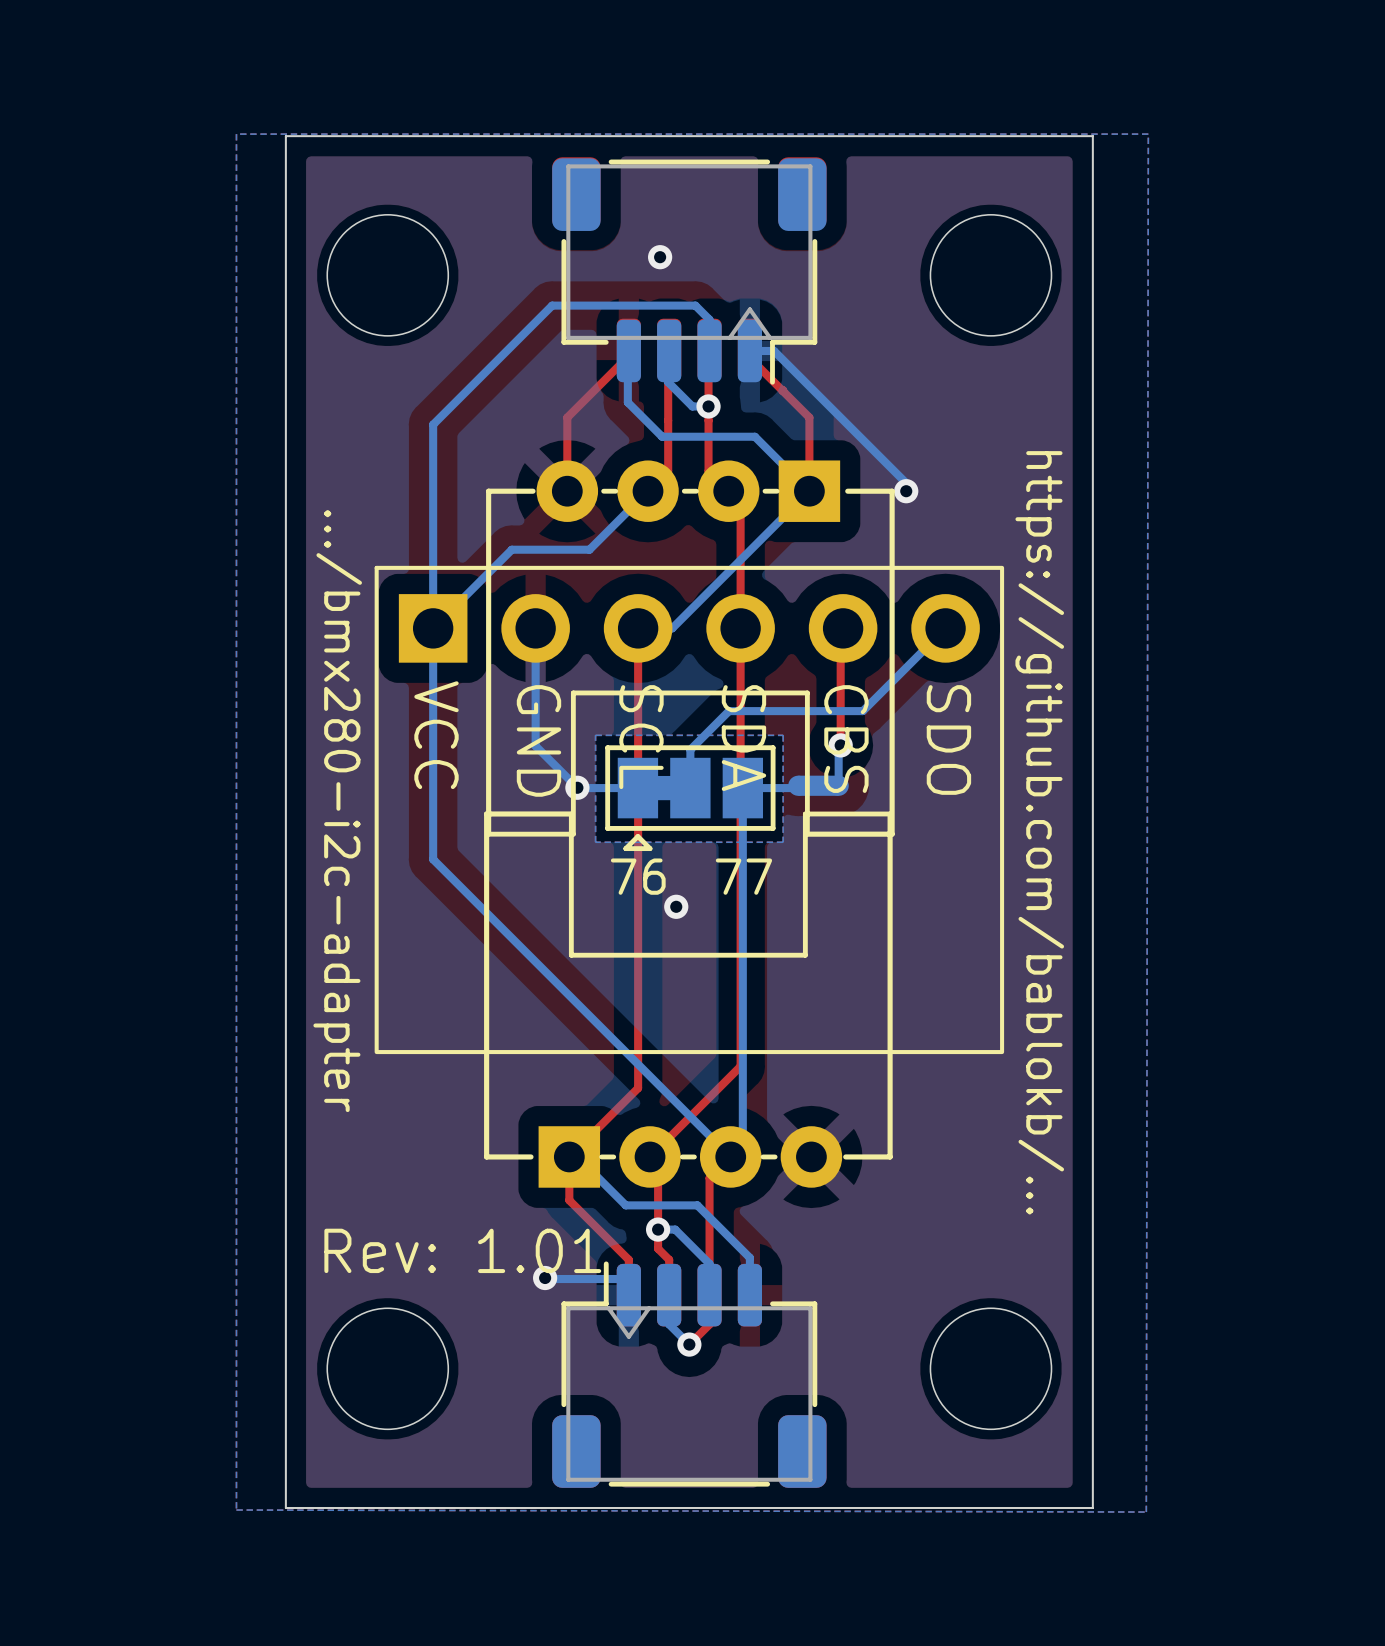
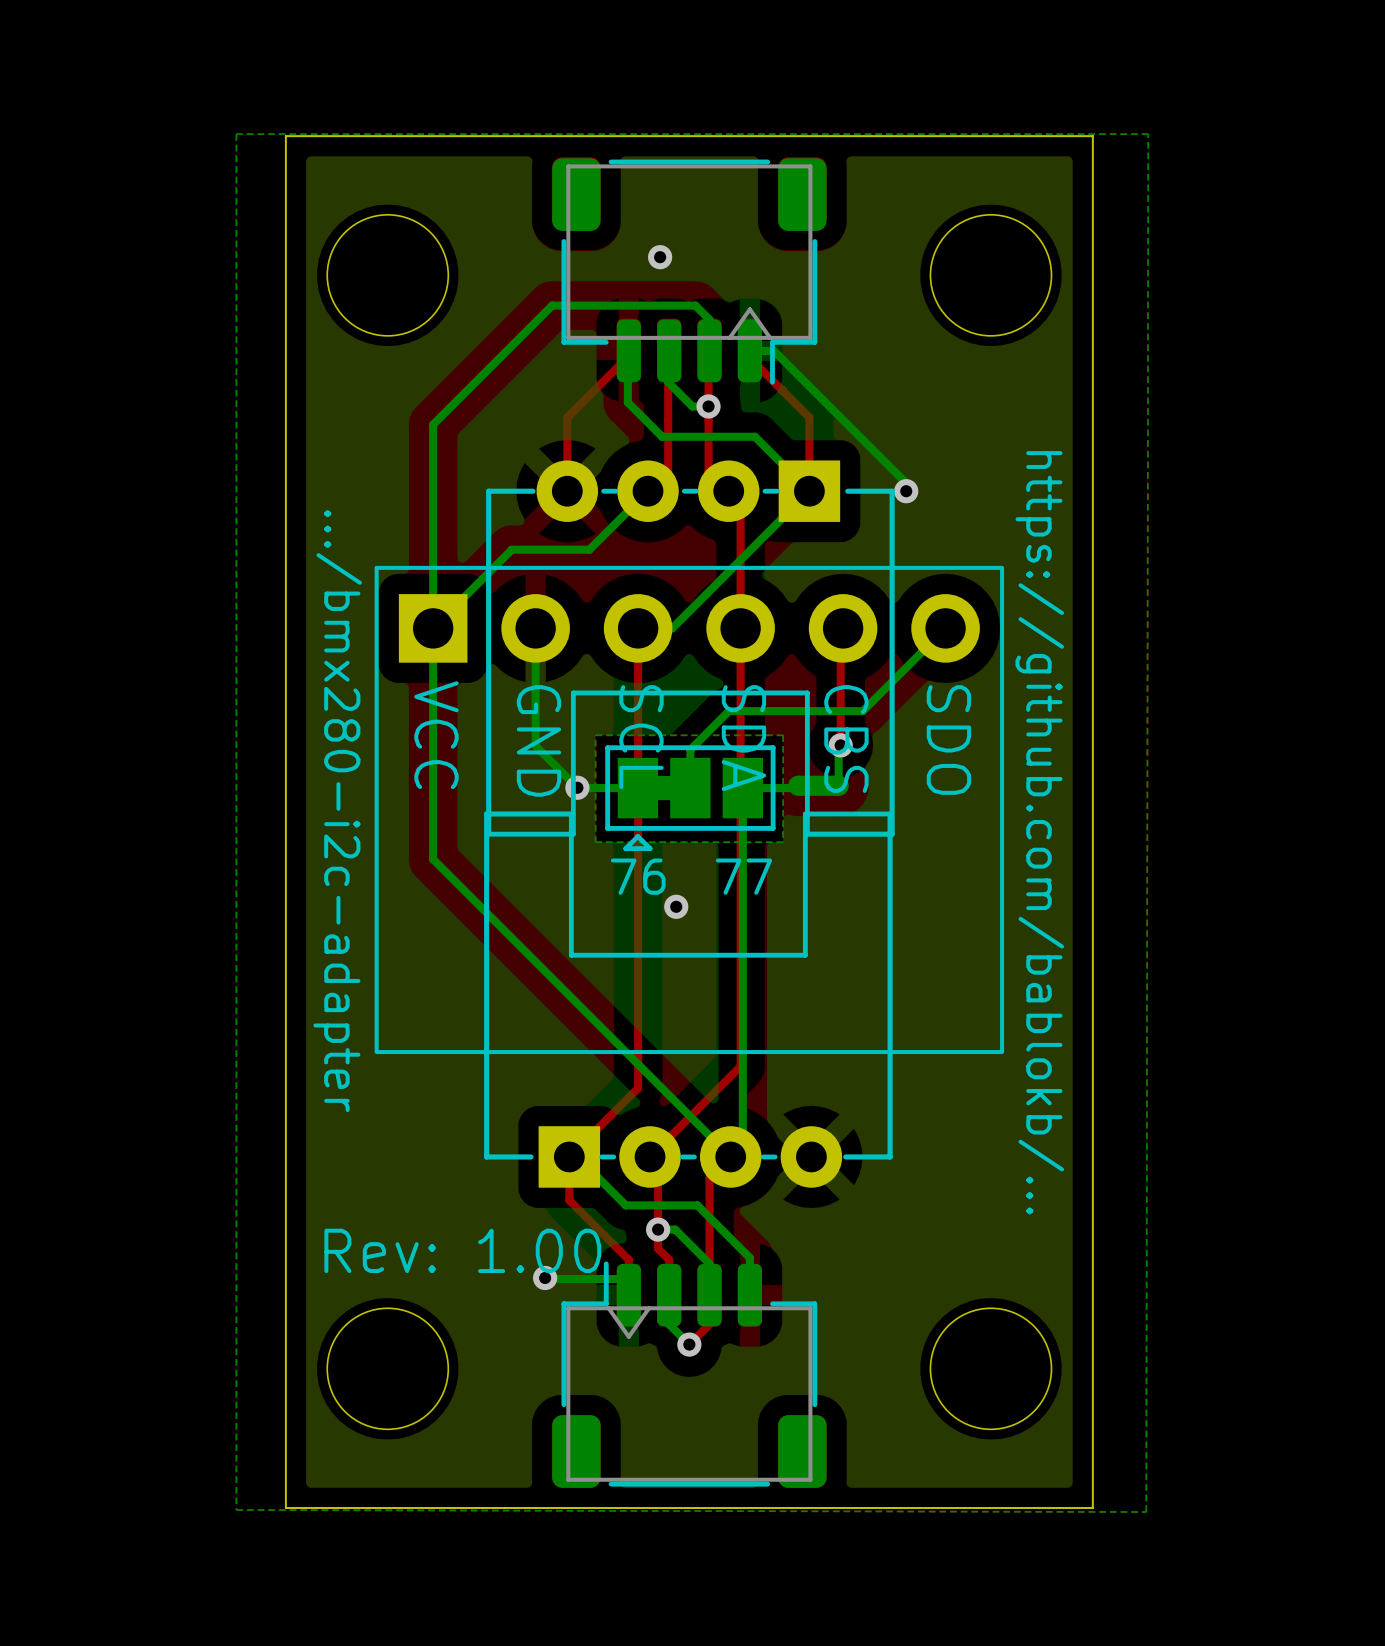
text: Rev: 1.01 (462, 1250) -> Rev: 1.00 (462, 1250)

